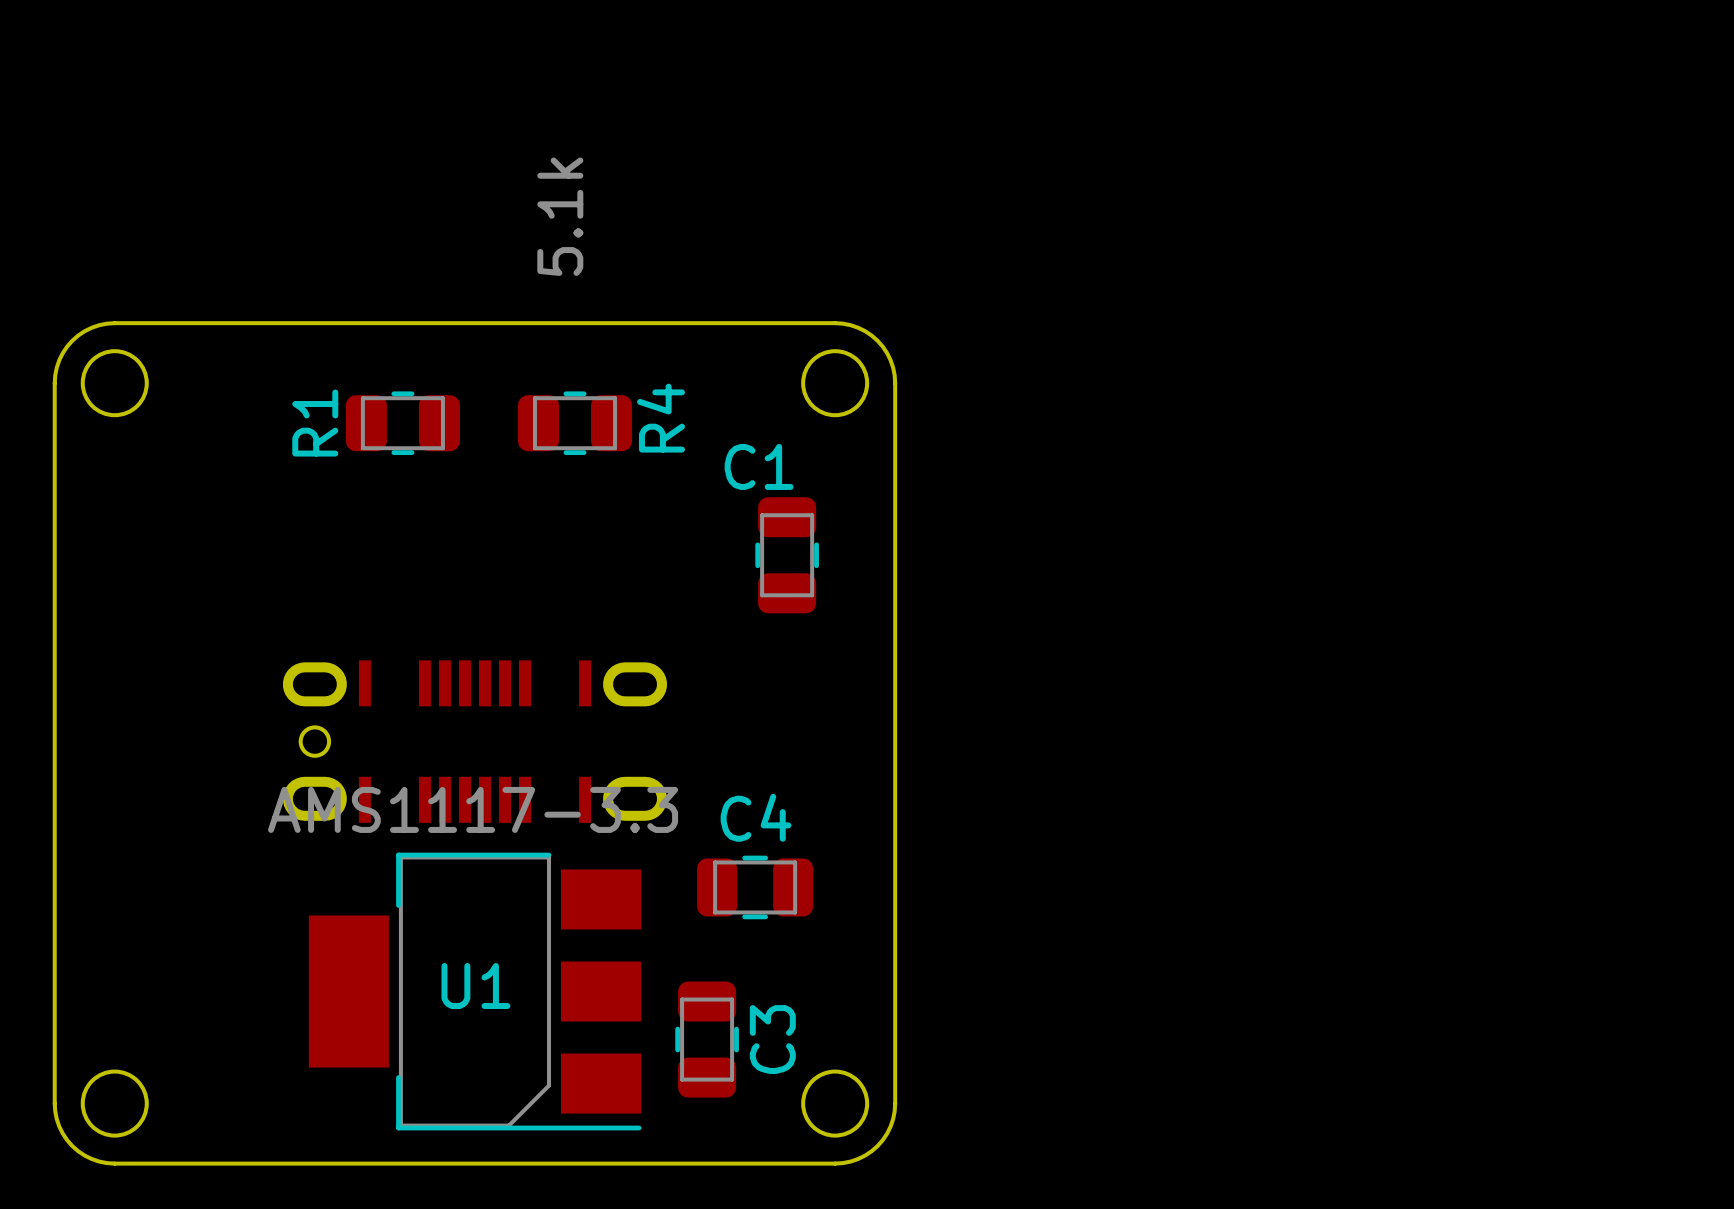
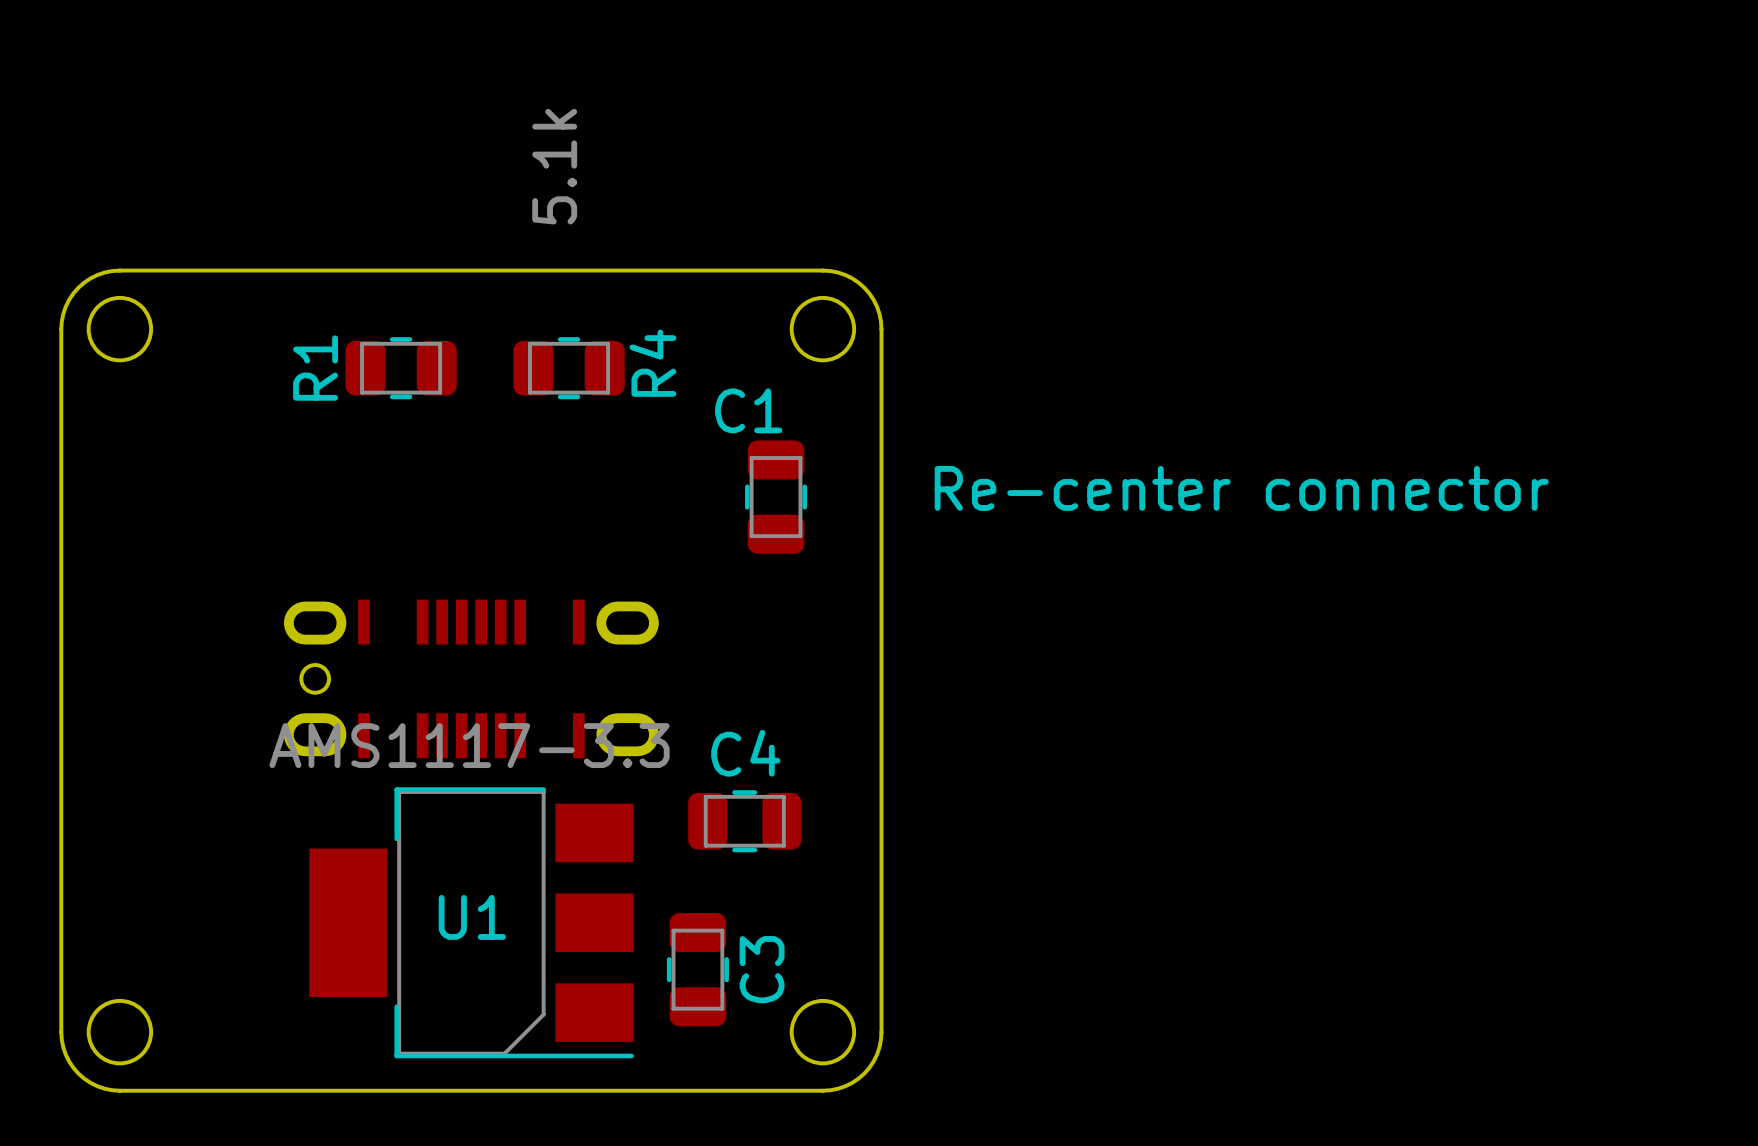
text: none -> Re-center connector (1241, 488)

